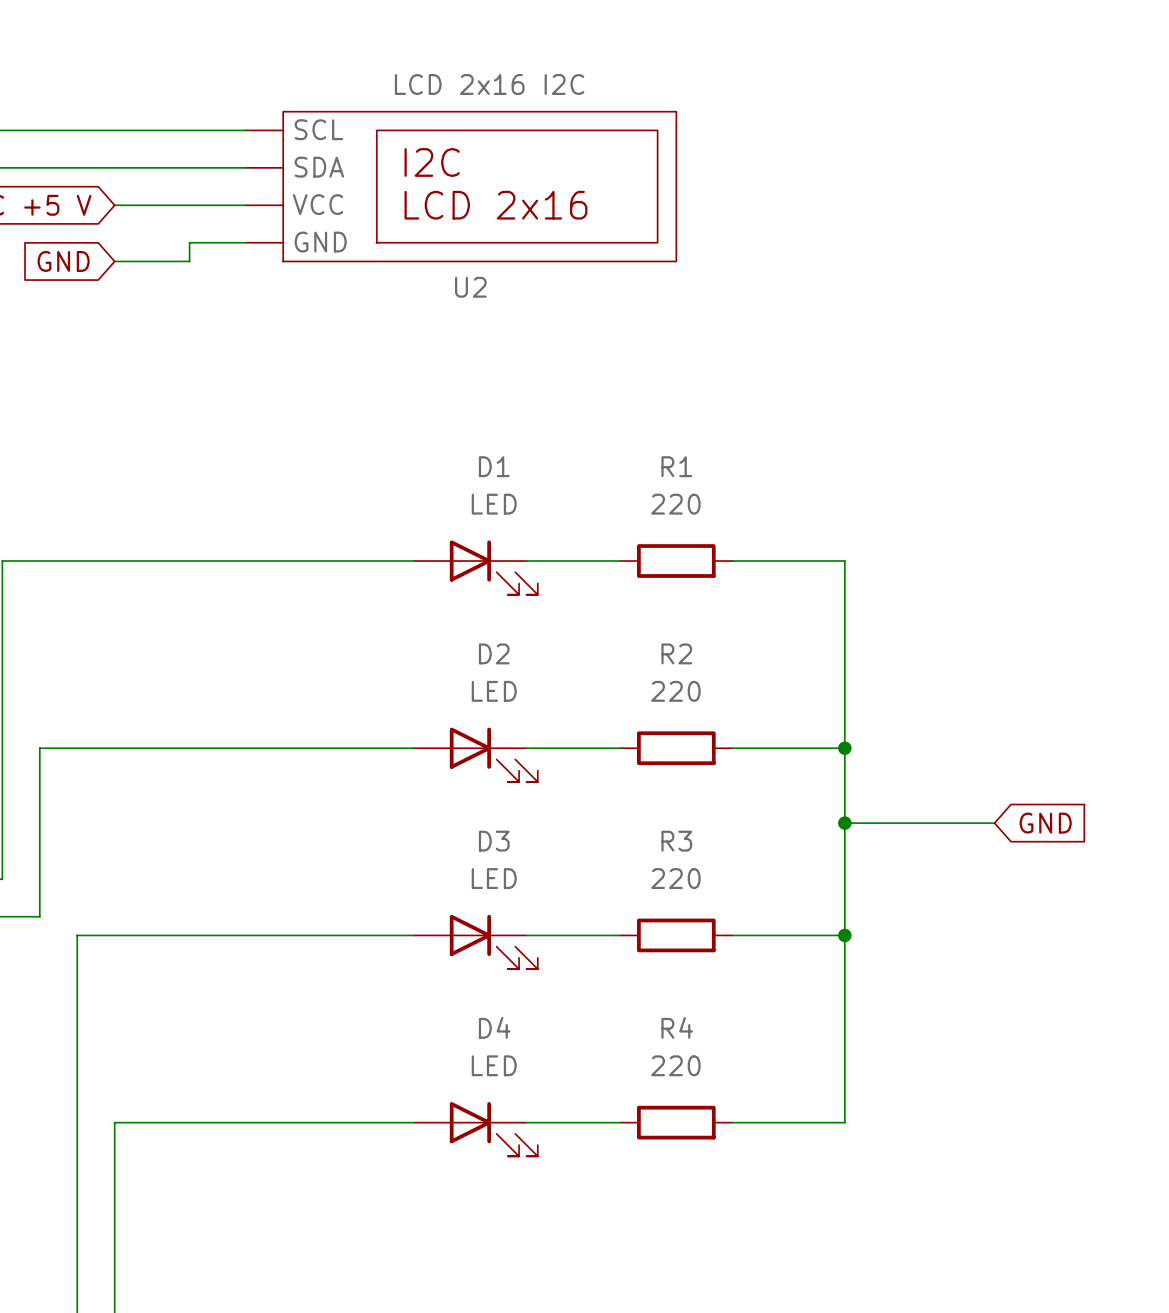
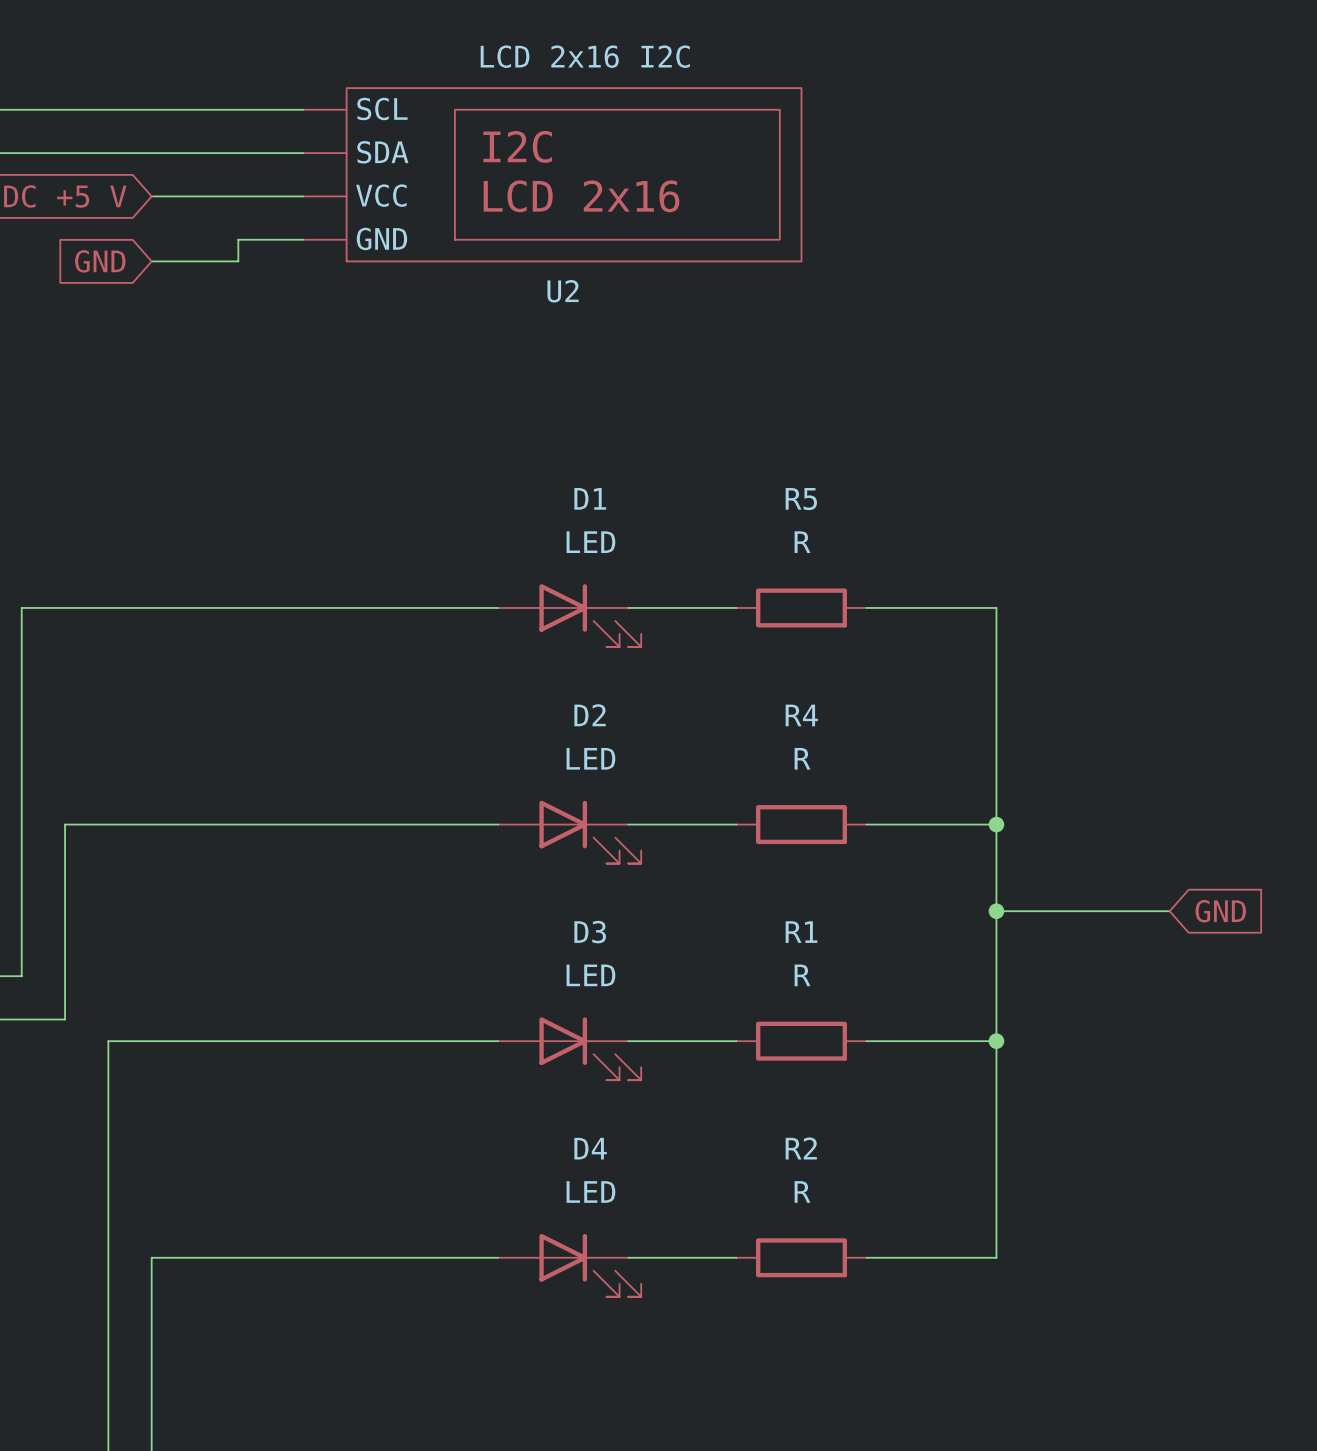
R1 name: R1 (676, 466) -> R5 (801, 499)
R1 value: 220 (675, 504) -> R (802, 542)
R2 name: R2 (676, 653) -> R4 (801, 715)
R2 value: 220 (675, 691) -> R (802, 758)
R3 name: R3 (676, 841) -> R1 (801, 932)
R3 value: 220 (675, 878) -> R (802, 975)
R4 name: R4 (677, 1027) -> R2 (801, 1148)
R4 value: 220 (675, 1065) -> R (802, 1191)

